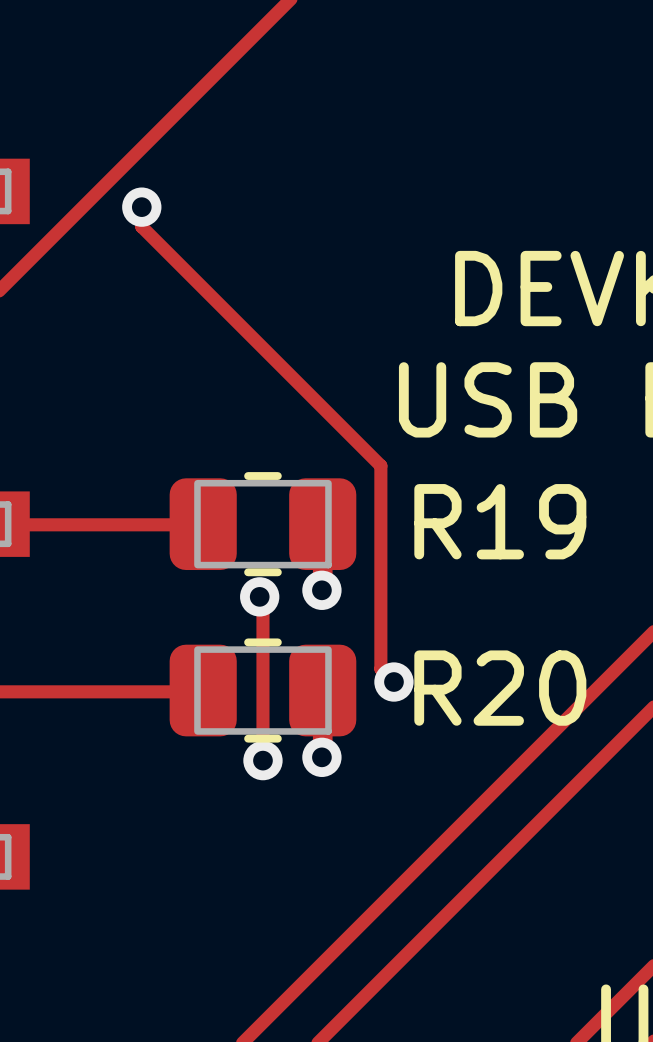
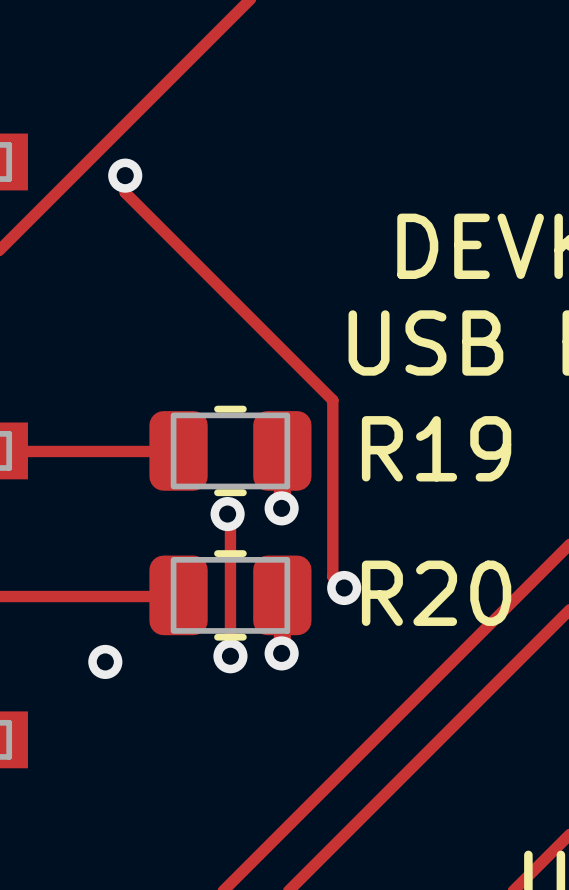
via: none -> (105, 661)

